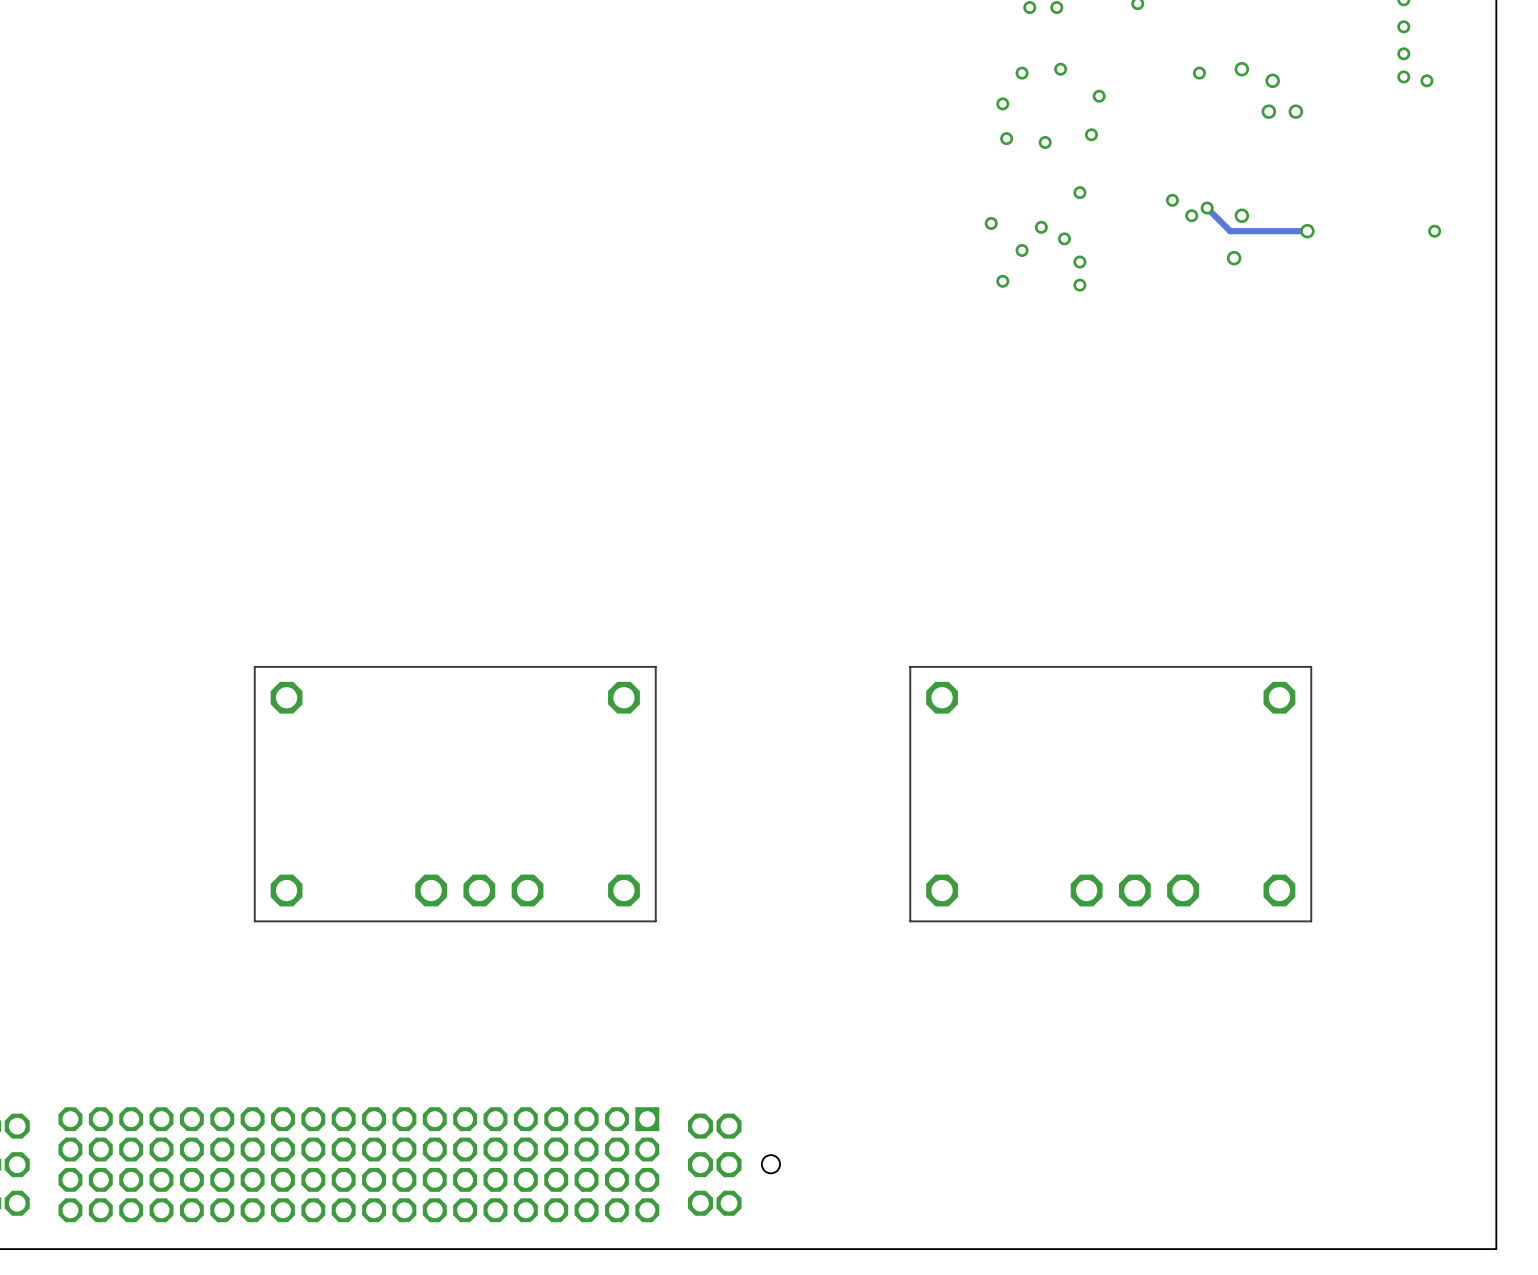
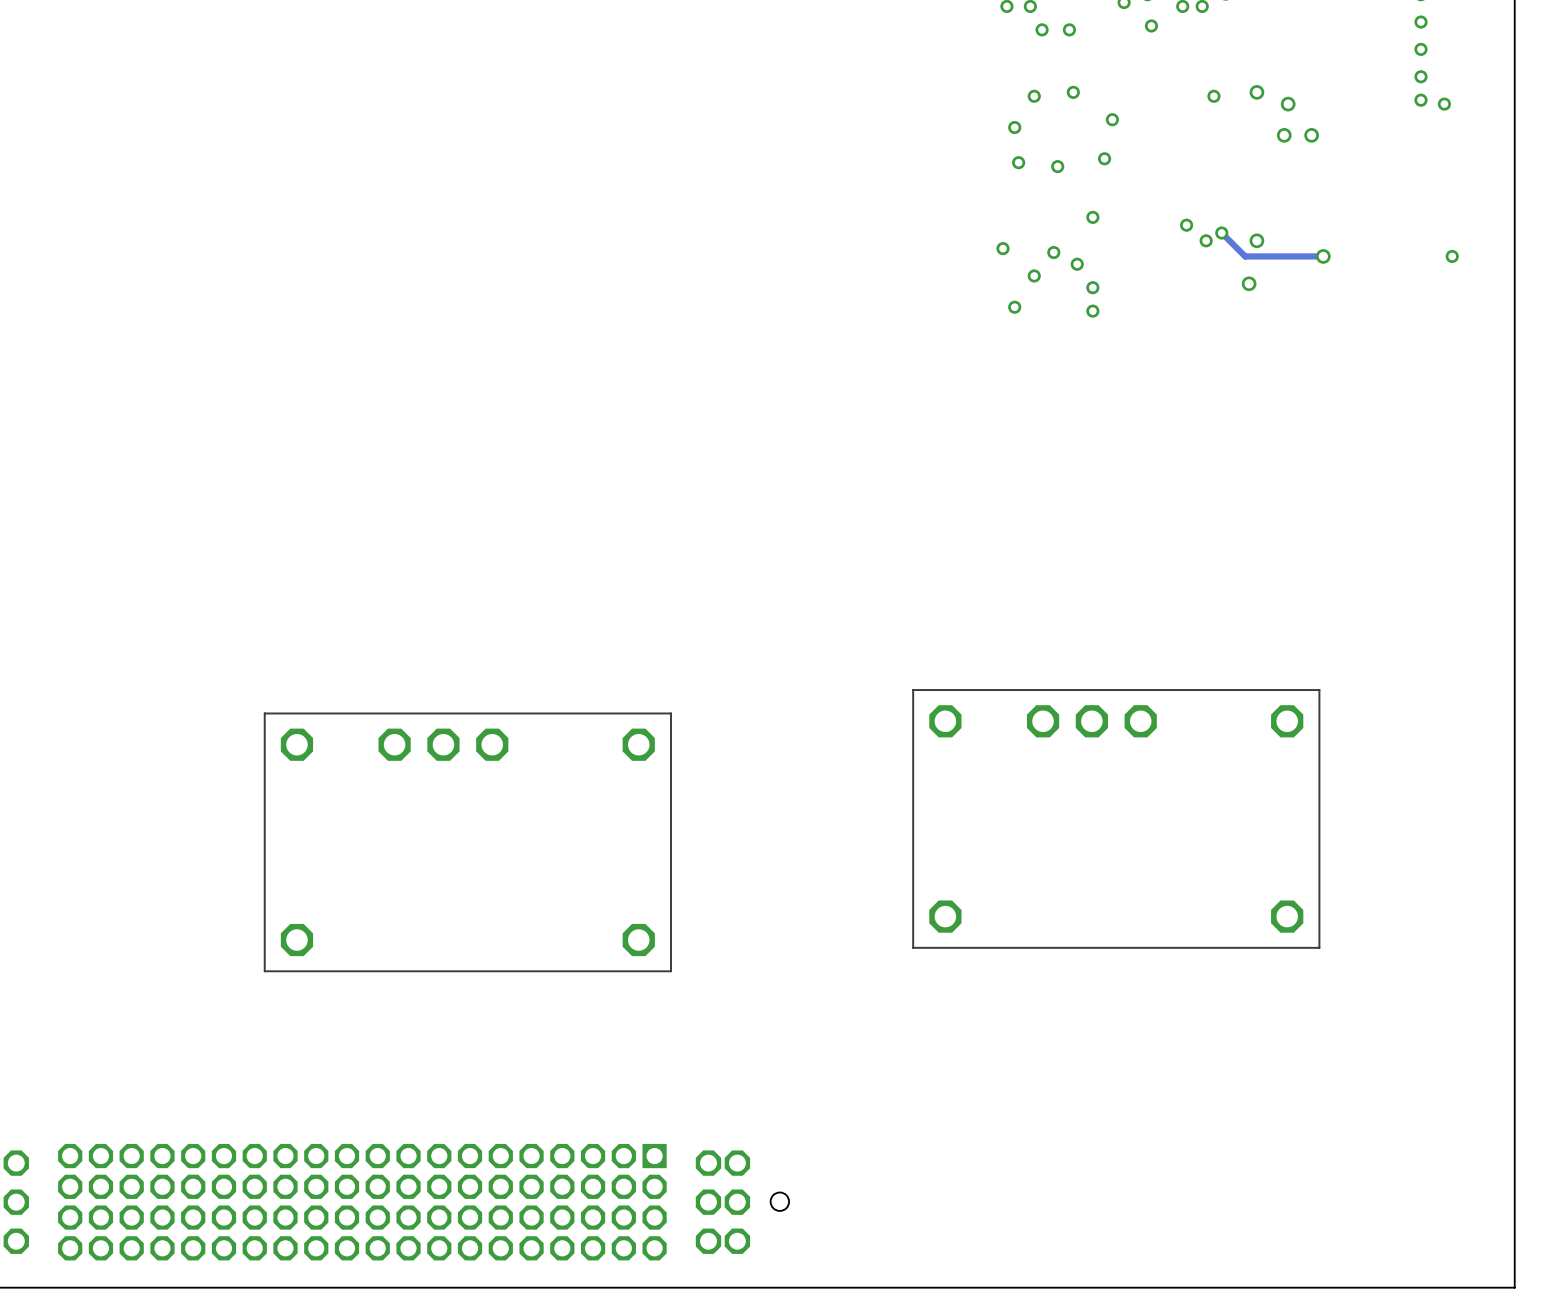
part rotation: 0° (455, 794) -> 180° (467, 842)
part rotation: 0° (1110, 794) -> 180° (1116, 818)

